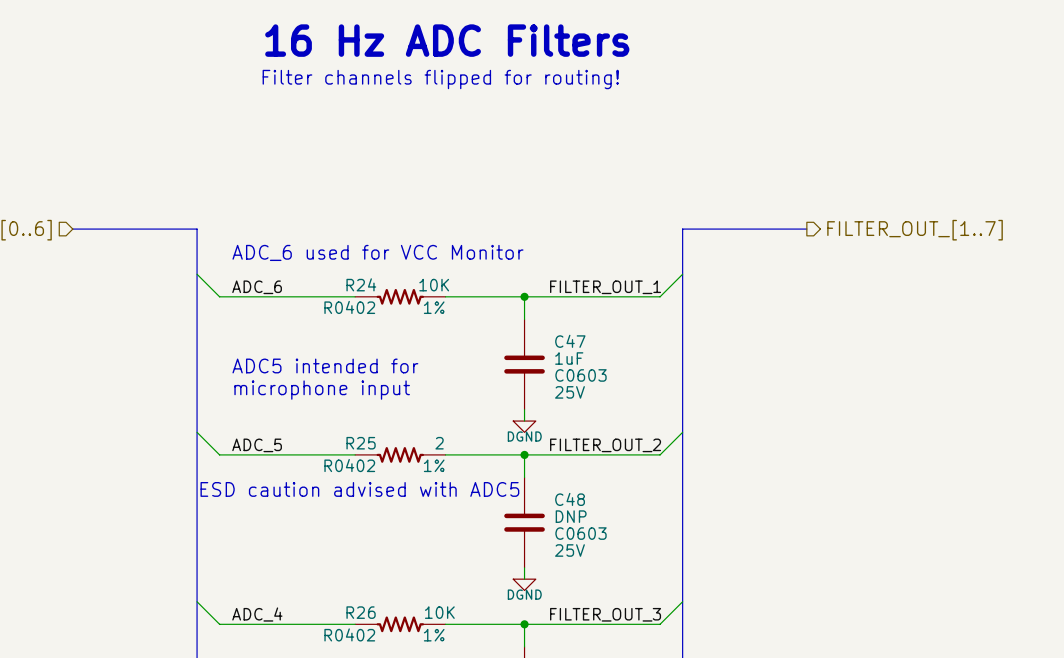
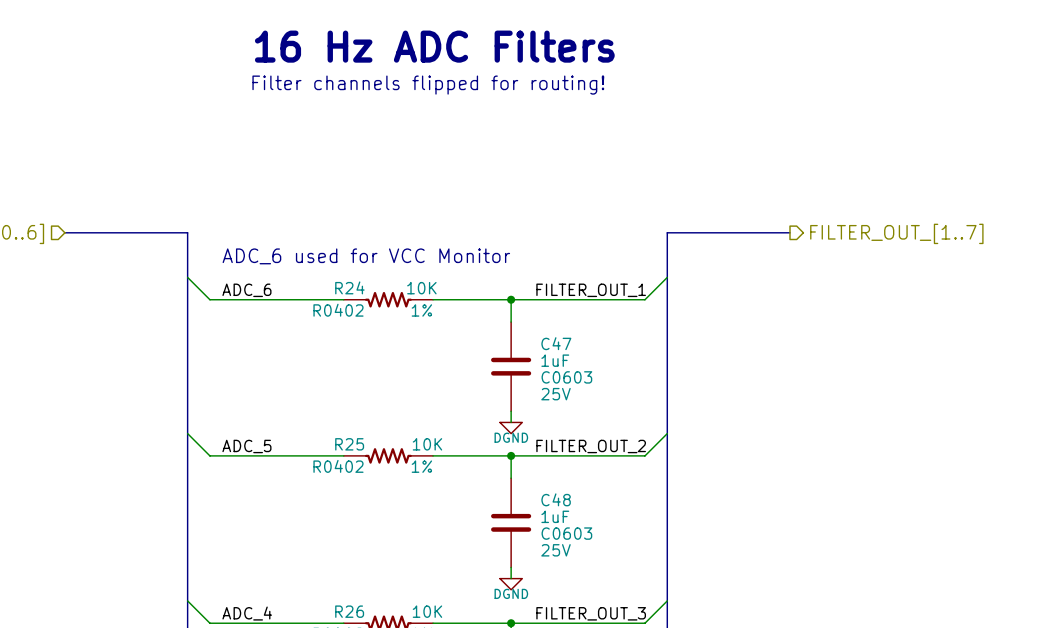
text: ADC5 intended for (325, 365) -> none
text: microphone input (322, 390) -> none
R25 value: 2 (439, 443) -> 10K (427, 444)
text: ESD caution advised with ADC5 (359, 489) -> none
C48 value: DNP (571, 516) -> 1uF (555, 516)

